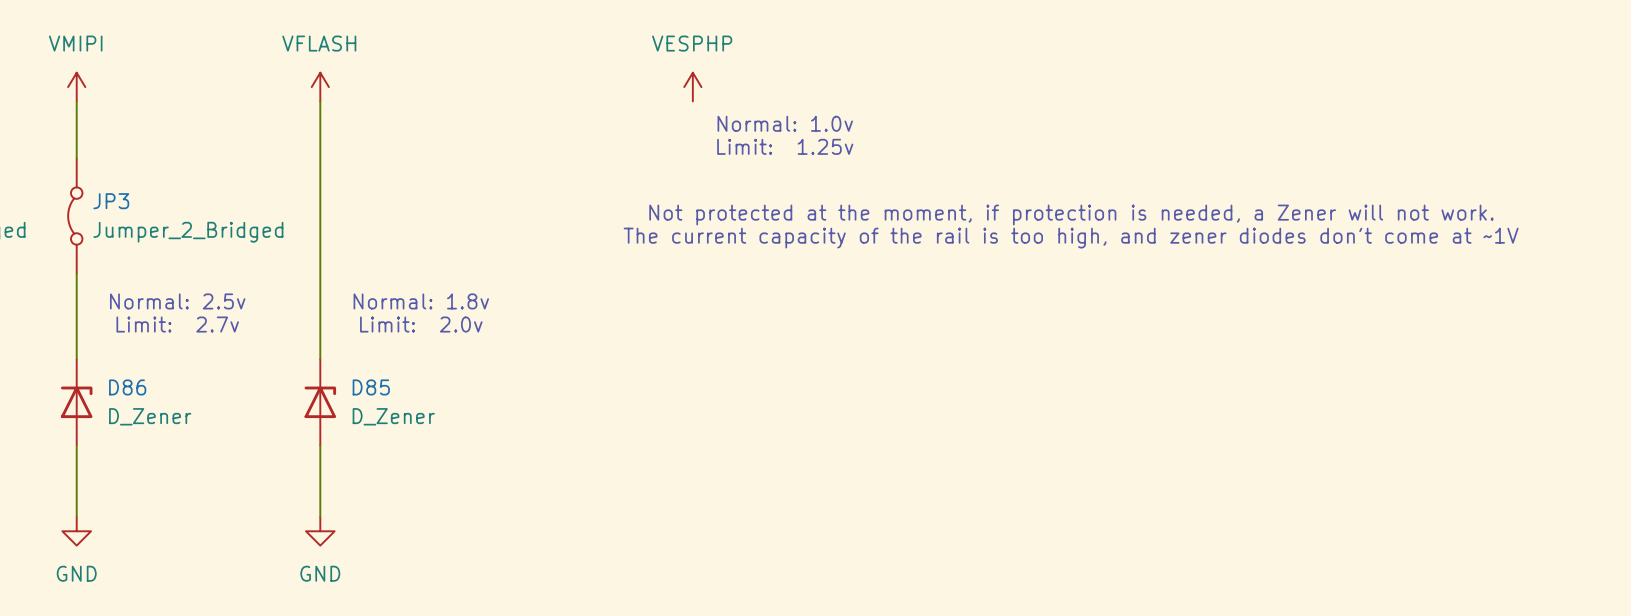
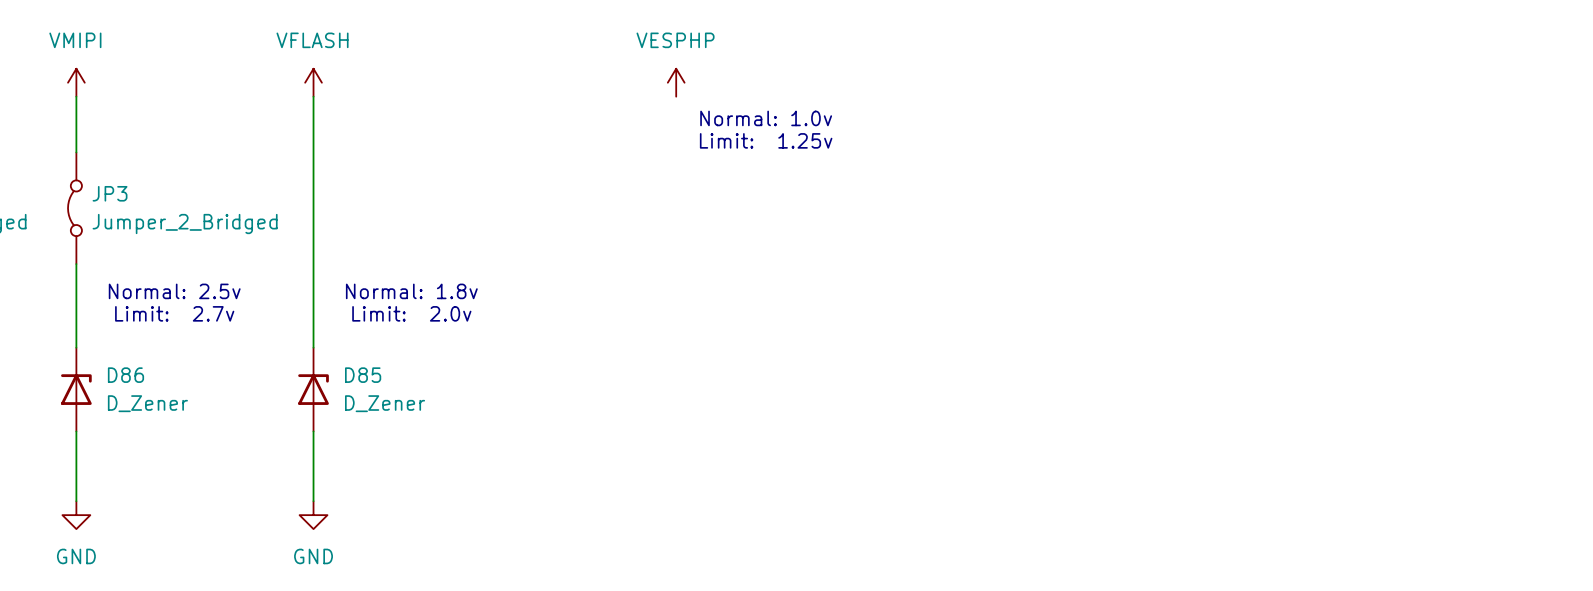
text: Not protected at the moment, if protection is needed, a Zener will not work. (1071, 215) -> none
text: The current capacity of the rail is too high, and zener diodes don't come at ~1V (1071, 238) -> none

